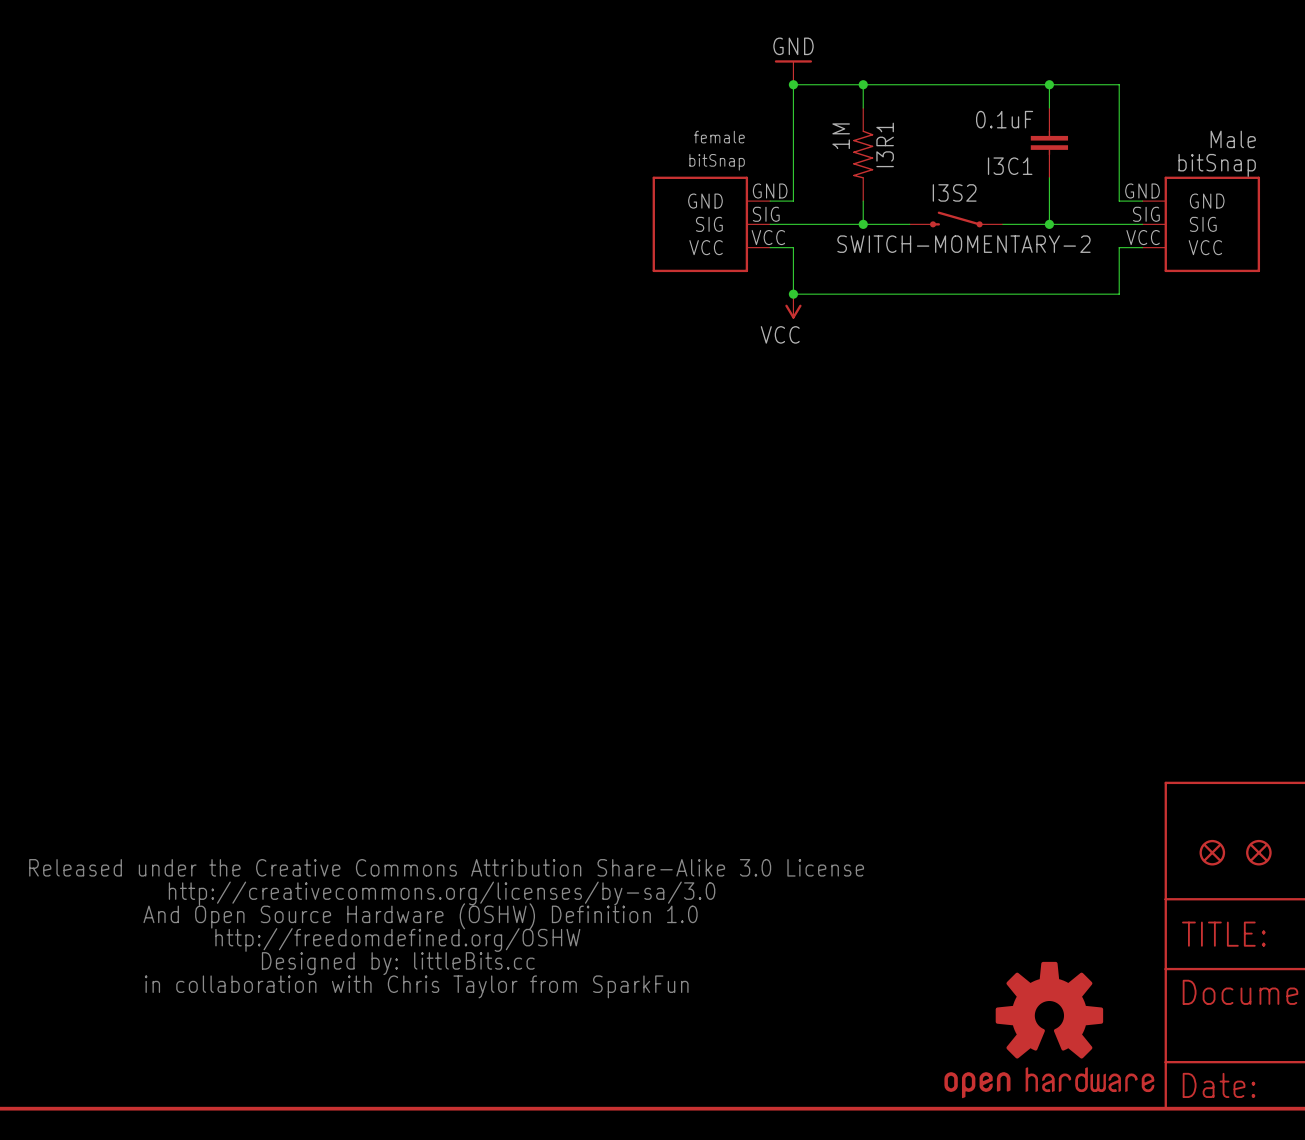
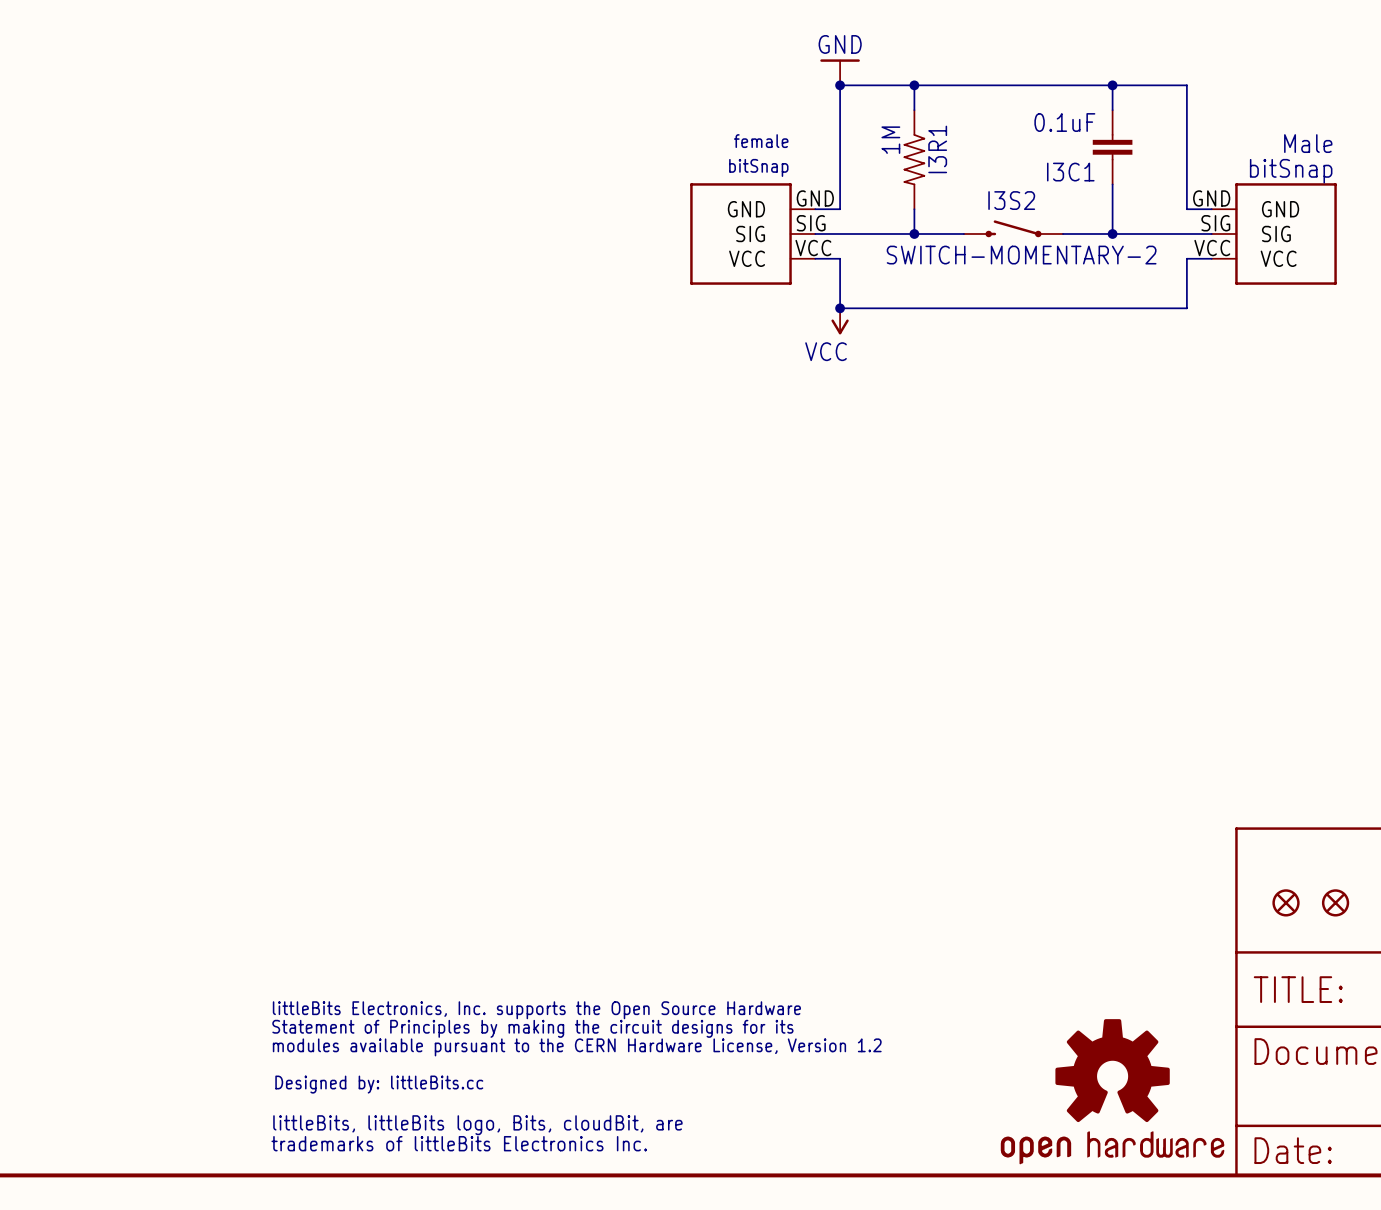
part: (446, 928) -> none
part: none -> (576, 1076)

